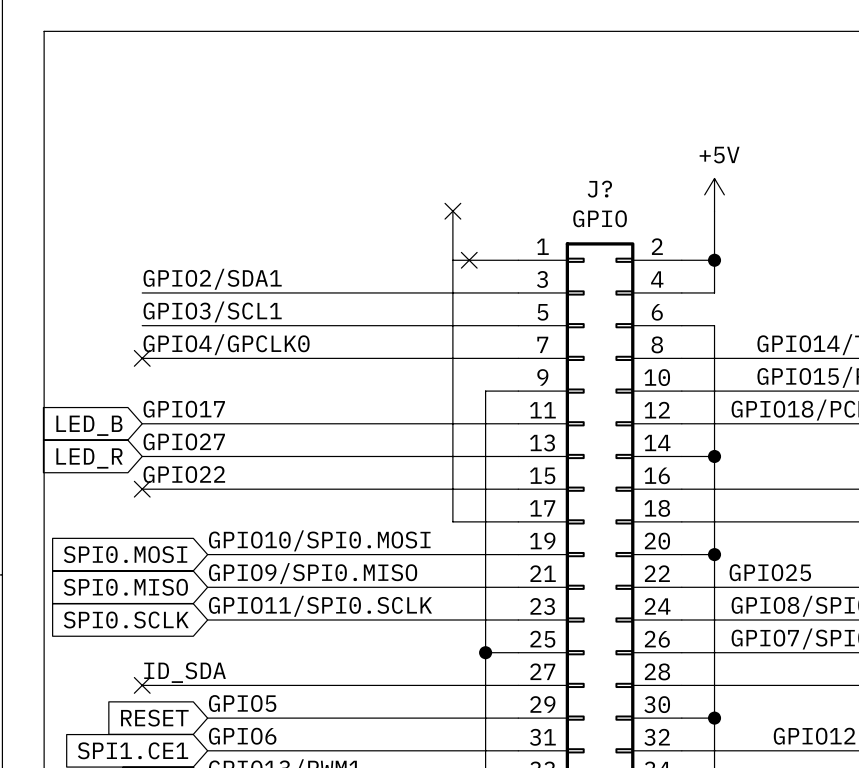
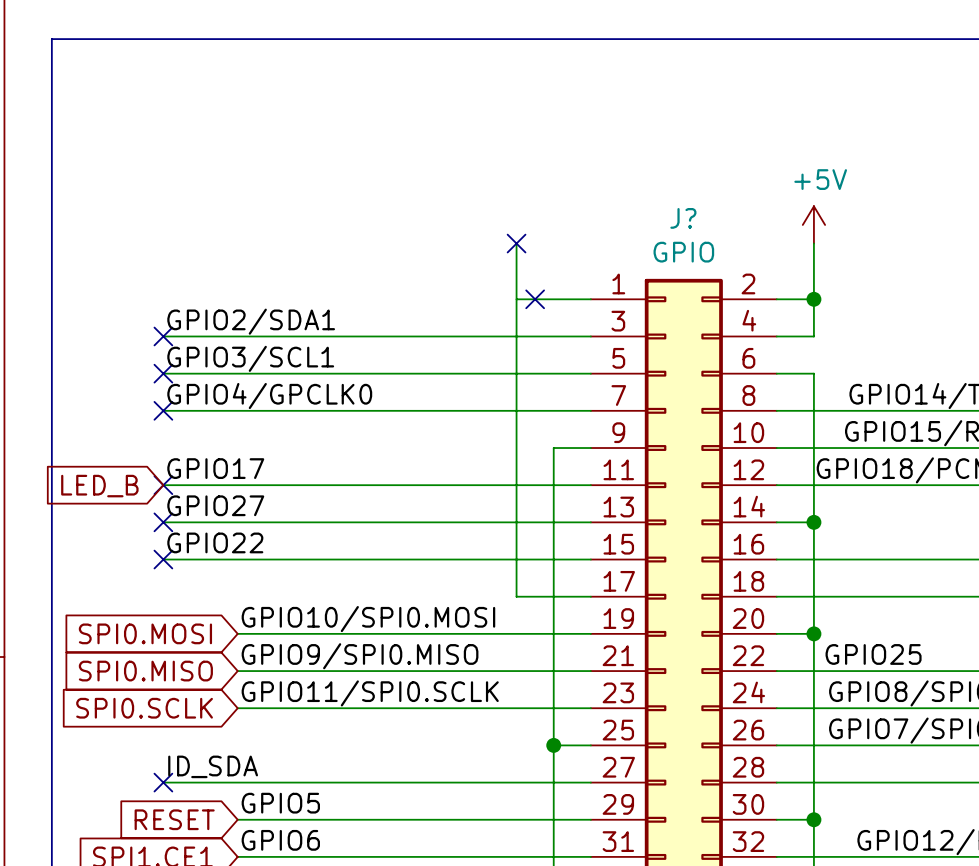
no-connect mark: none -> (163, 336)
no-connect mark: none -> (163, 373)
no-connect mark: none -> (163, 485)
no-connect mark: none -> (163, 522)
global label: LED_R (89, 458) -> none

